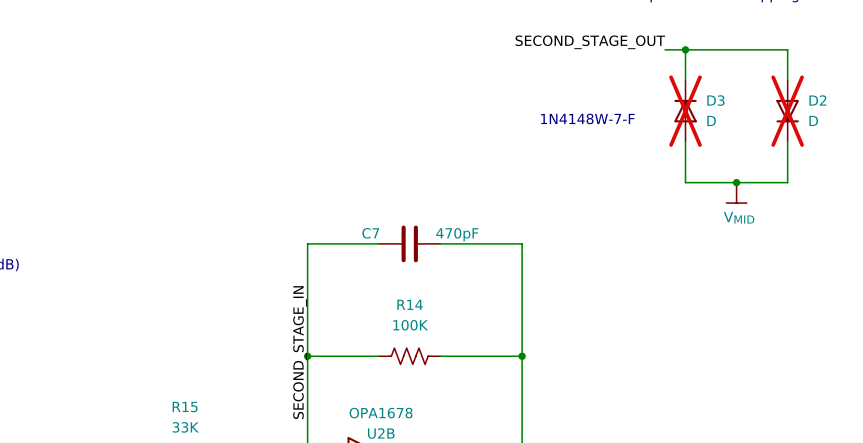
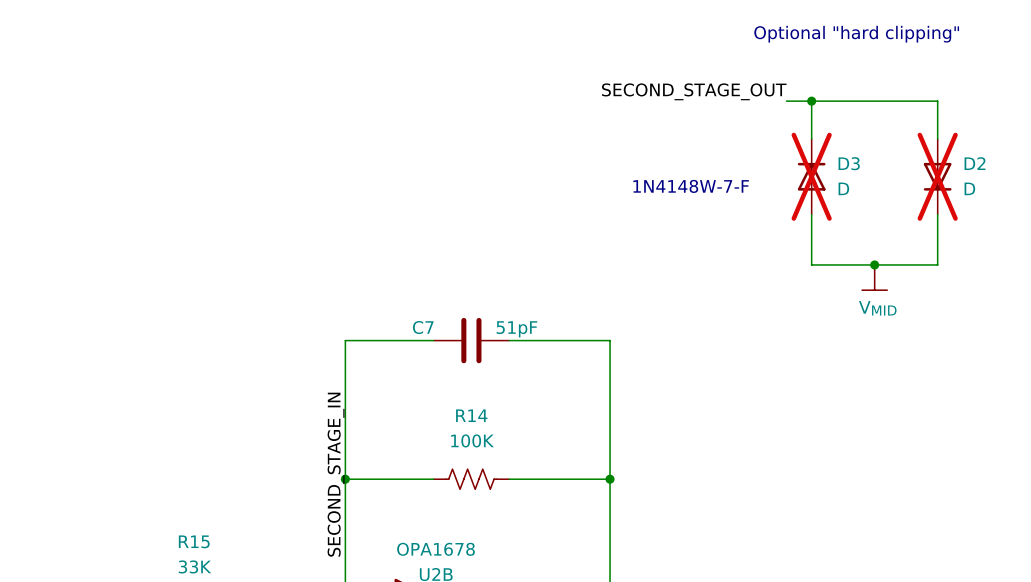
C7 value: 470pF (457, 234) -> 51pF (516, 329)

